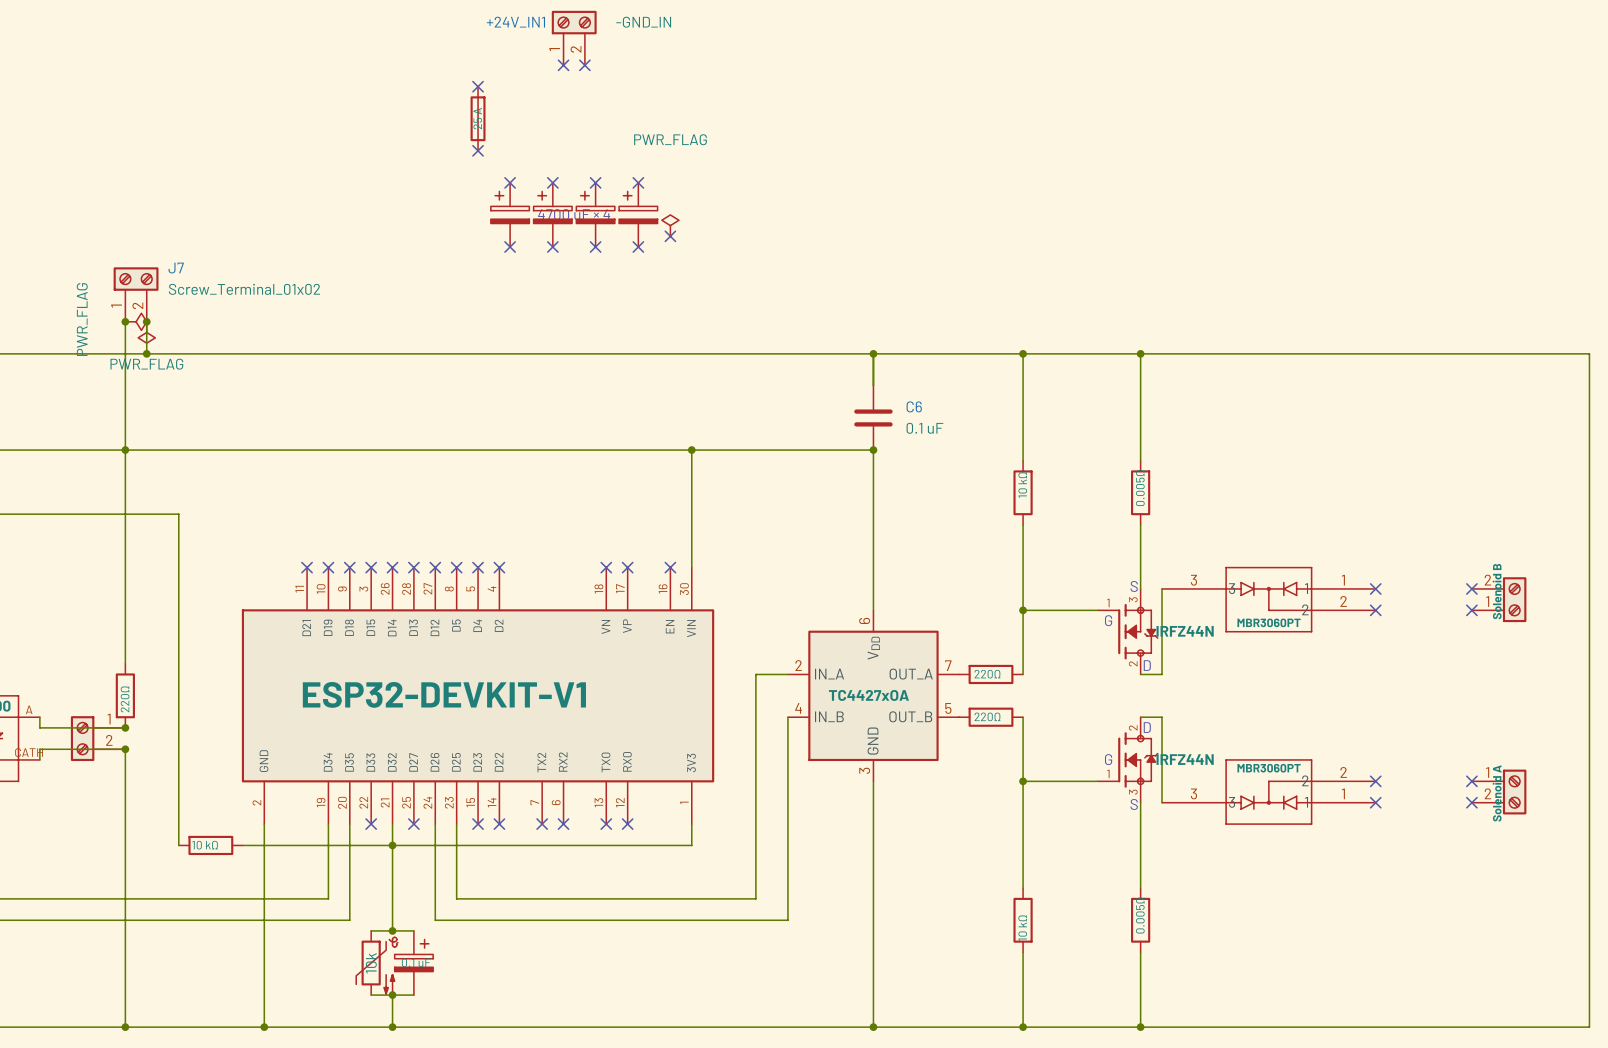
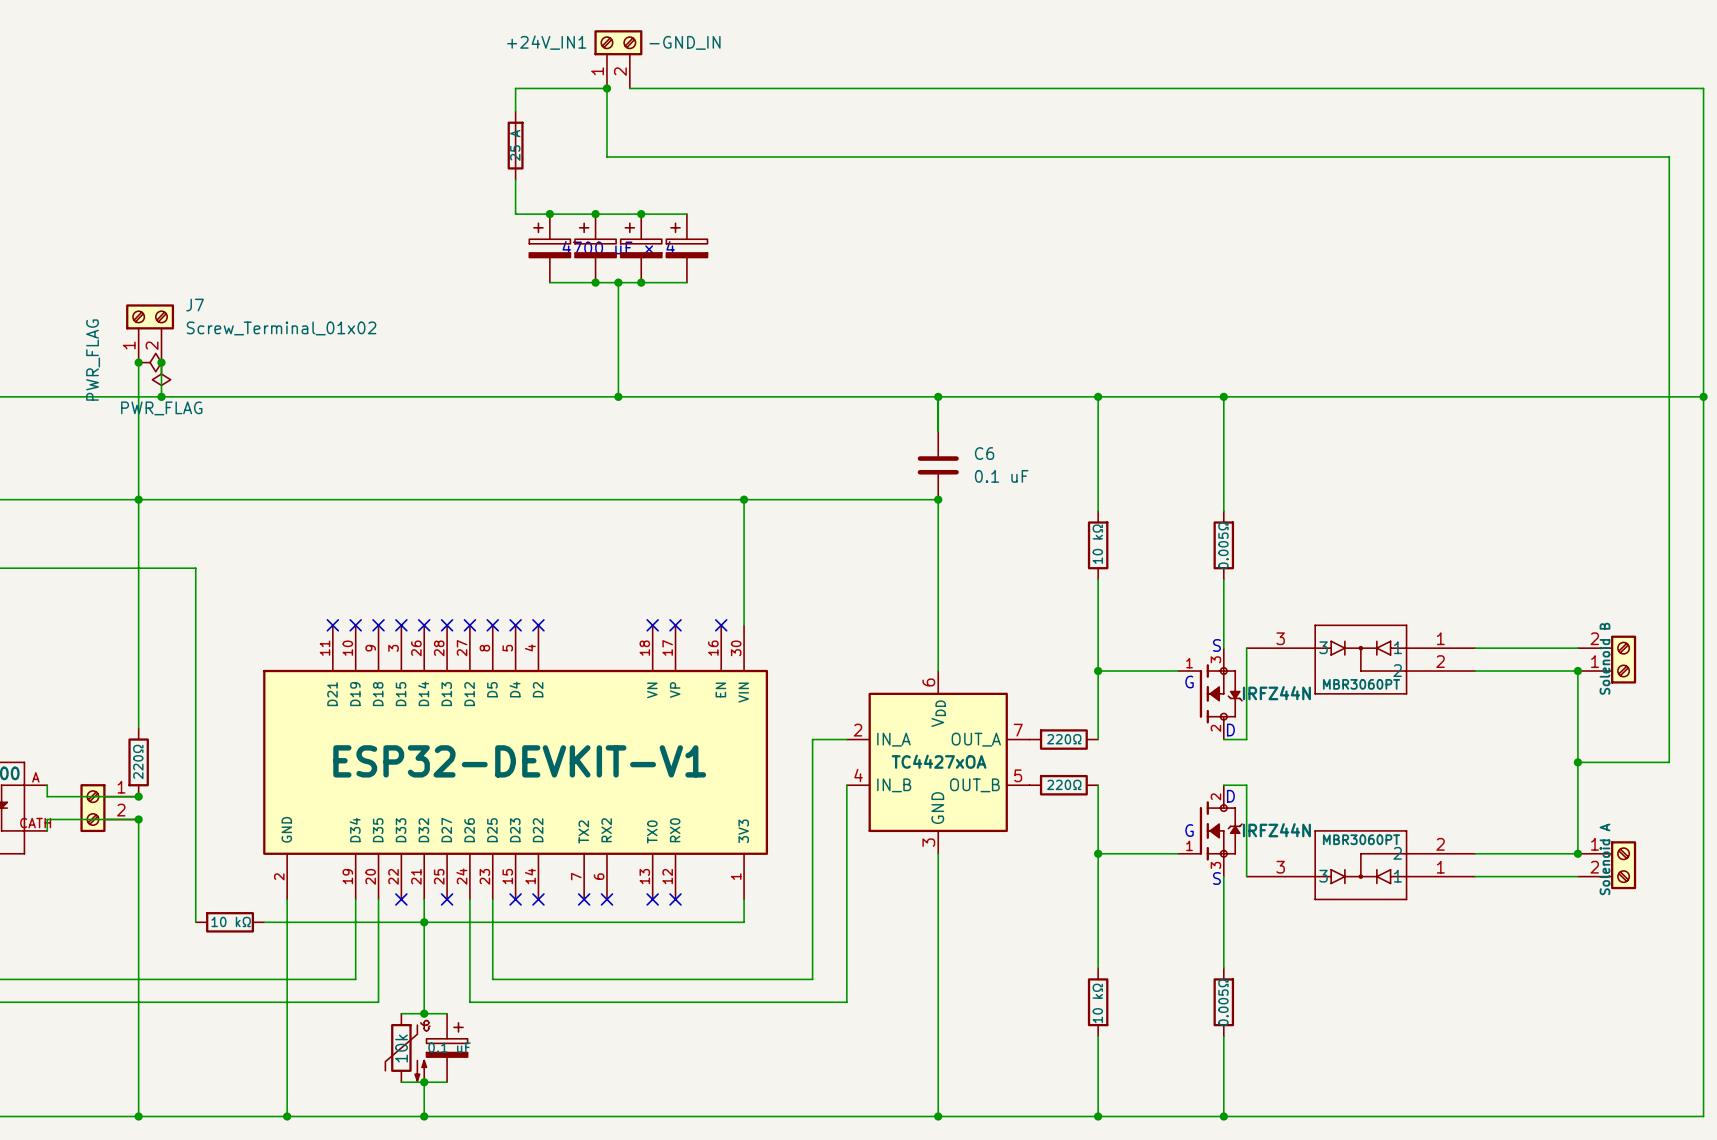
no-connect mark: (563, 65) -> none
junction: none -> (606, 88)
wire: none -> (629, 88) (1703, 88) (1703, 396)
no-connect mark: (584, 65) -> none
wire: none -> (515, 111) (515, 88) (606, 88) (606, 156) (1669, 156) (1669, 762) (1577, 762)
no-connect mark: (478, 86) -> none
wire: none -> (515, 179) (515, 214) (686, 214)
no-connect mark: (478, 150) -> none
no-connect mark: (510, 182) -> none
junction: none -> (549, 214)
no-connect mark: (552, 182) -> none
junction: none -> (595, 214)
no-connect mark: (595, 182) -> none
junction: none -> (641, 214)
no-connect mark: (638, 182) -> none
power symbol: PWR_FLAG (670, 225) -> none
no-connect mark: (670, 236) -> none
wire: none -> (549, 282) (686, 282)
no-connect mark: (510, 247) -> none
no-connect mark: (552, 247) -> none
junction: none -> (595, 282)
wire: none -> (618, 282) (618, 396)
junction: none -> (618, 282)
no-connect mark: (595, 247) -> none
junction: none -> (641, 282)
no-connect mark: (638, 247) -> none
junction: none -> (618, 396)
junction: none -> (1703, 396)
wire: none -> (1475, 648) (1577, 648)
no-connect mark: (1375, 588) -> none
no-connect mark: (1471, 588) -> none
wire: none -> (1475, 671) (1577, 671) (1577, 853) (1475, 853)
no-connect mark: (1375, 610) -> none
no-connect mark: (1471, 610) -> none
junction: none -> (1577, 671)
junction: none -> (1577, 762)
no-connect mark: (1375, 781) -> none
no-connect mark: (1471, 781) -> none
junction: none -> (1577, 853)
wire: none -> (1475, 876) (1577, 876)
no-connect mark: (1375, 802) -> none
no-connect mark: (1471, 802) -> none

